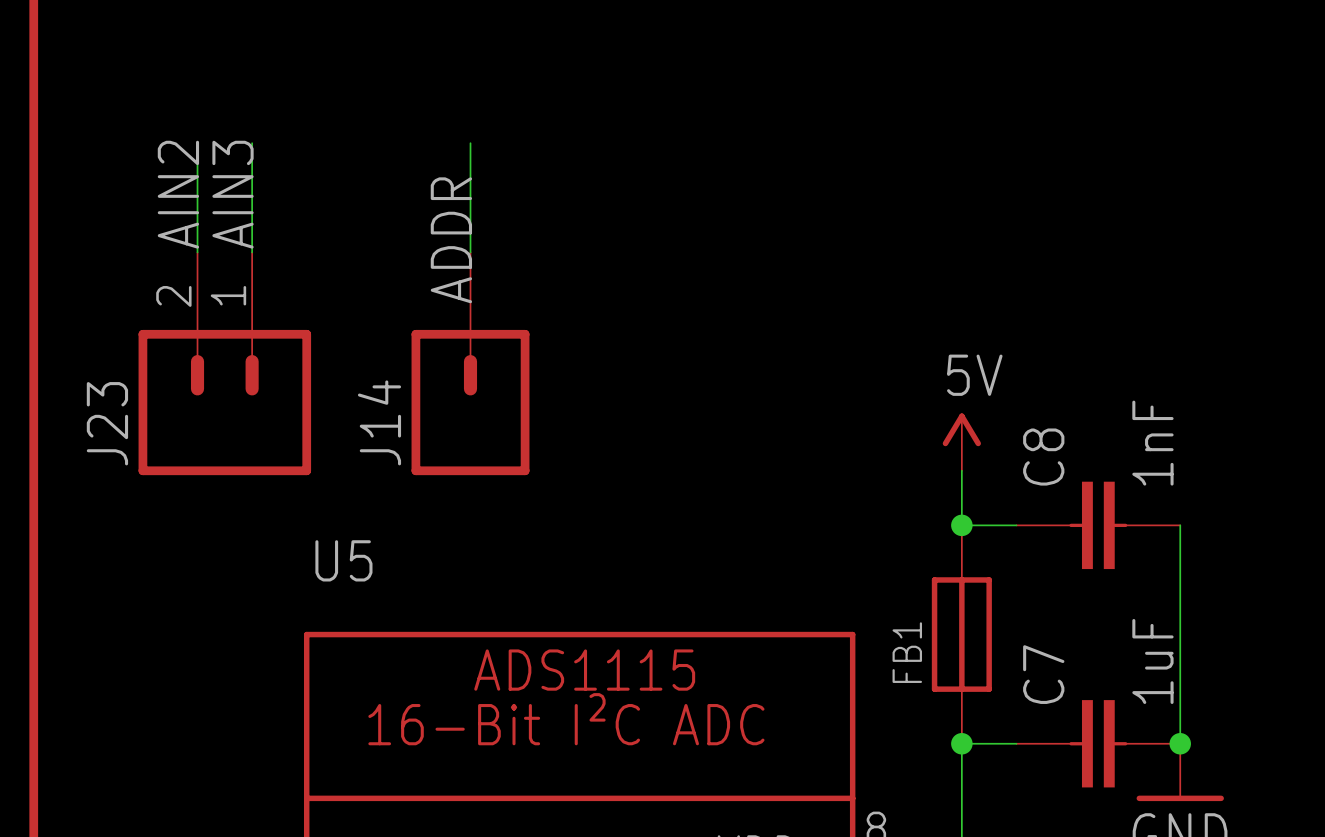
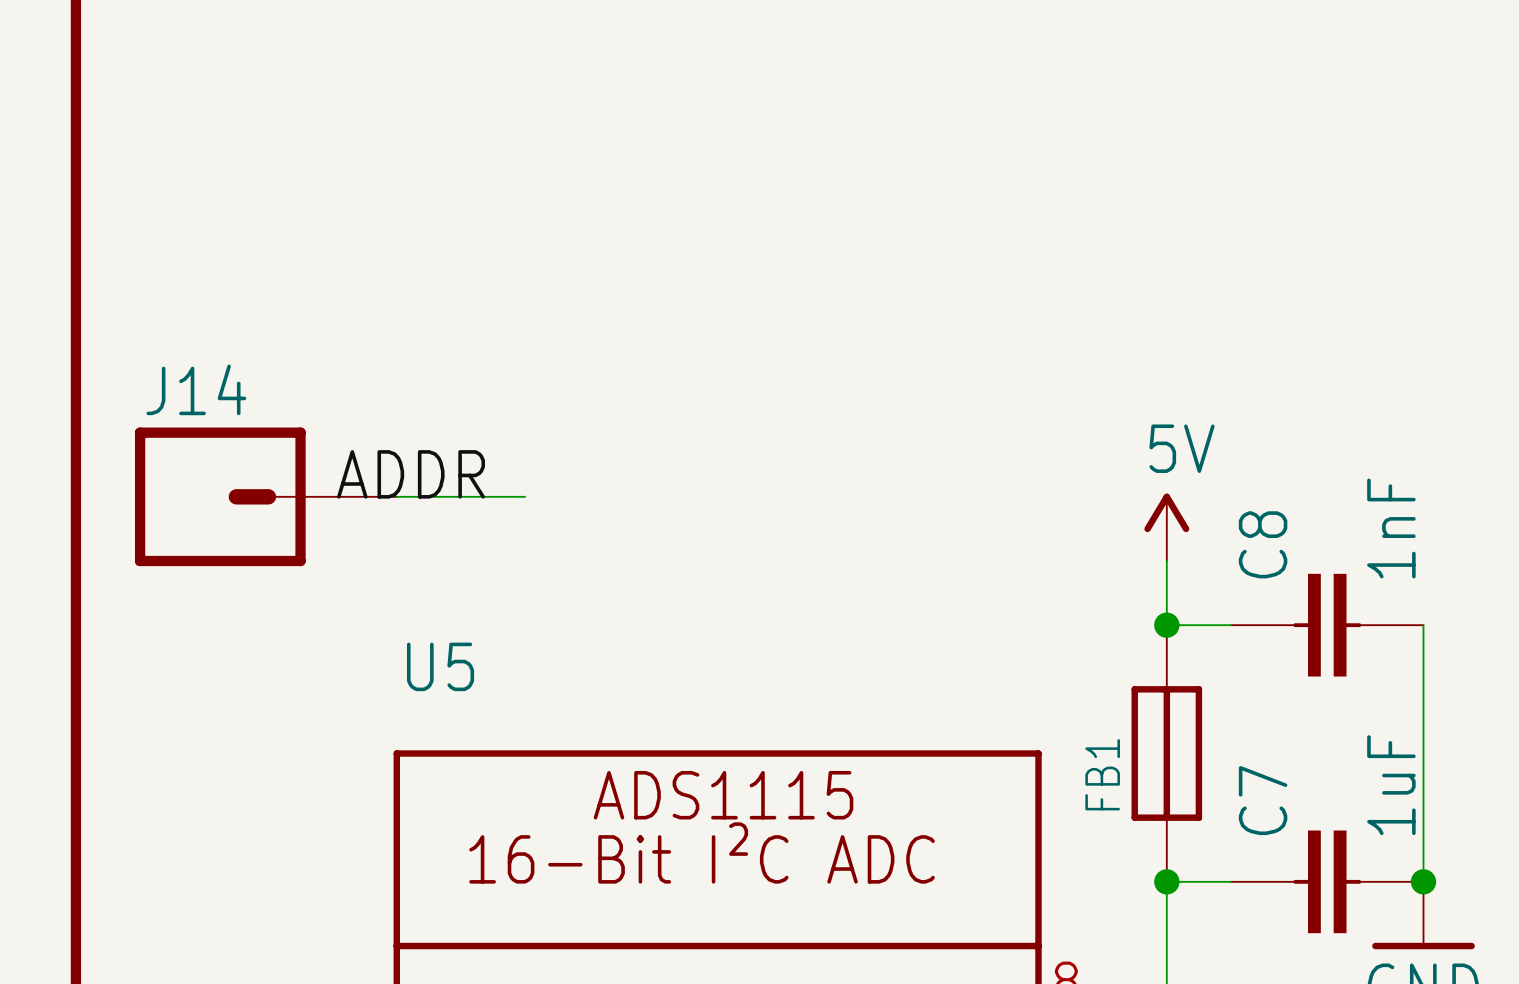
wire: (197, 143) (197, 252) -> none
wire: (252, 143) (252, 252) -> none
wire: (470, 143) (470, 252) -> none
label: AIN2 (178, 194) -> none
label: AIN3 (233, 194) -> none
label rotation: 0° (451, 240) -> 90° clockwise (411, 474)
label position: ADDR (451, 240) -> ADDR (411, 474)
J23: (224, 363) -> none
J14 position: (470, 363) -> (265, 496)
J14 rotation: 0° (470, 402) -> 90° clockwise (220, 496)
wire: none -> (396, 496) (525, 496)

